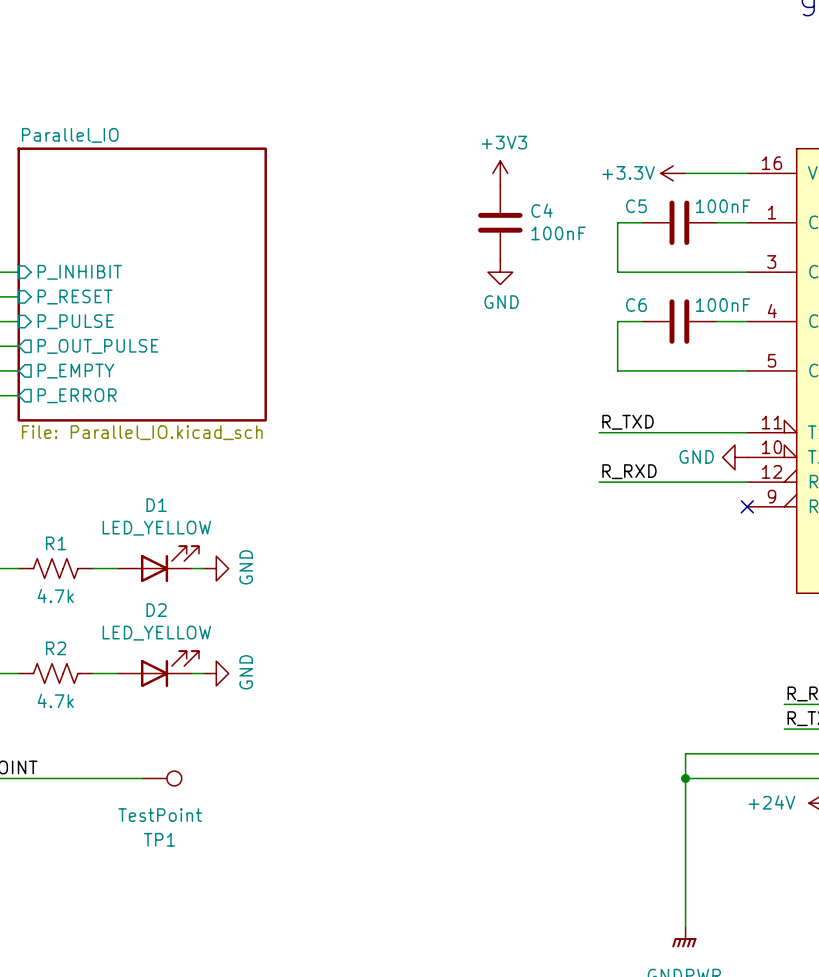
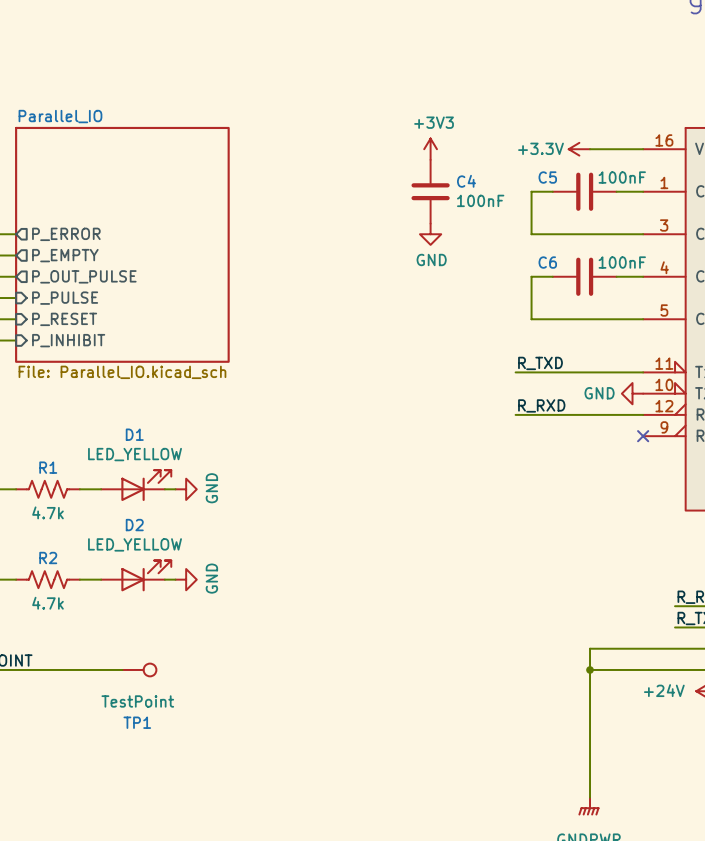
sheet pin shape: input (79, 272) -> output (66, 234)
sheet pin: P_INHIBIT (79, 272) -> P_ERROR (66, 234)
sheet pin shape: input (75, 297) -> output (65, 255)
sheet pin: P_RESET (75, 297) -> P_EMPTY (65, 255)
sheet pin shape: input (75, 321) -> output (84, 276)
sheet pin: P_PULSE (75, 321) -> P_OUT_PULSE (84, 276)
sheet pin shape: output (98, 346) -> input (65, 298)
sheet pin: P_OUT_PULSE (98, 346) -> P_PULSE (65, 298)
sheet pin shape: output (75, 371) -> input (64, 319)
sheet pin: P_EMPTY (75, 371) -> P_RESET (64, 319)
sheet pin shape: output (77, 395) -> input (68, 340)
sheet pin: P_ERROR (77, 395) -> P_INHIBIT (68, 340)

